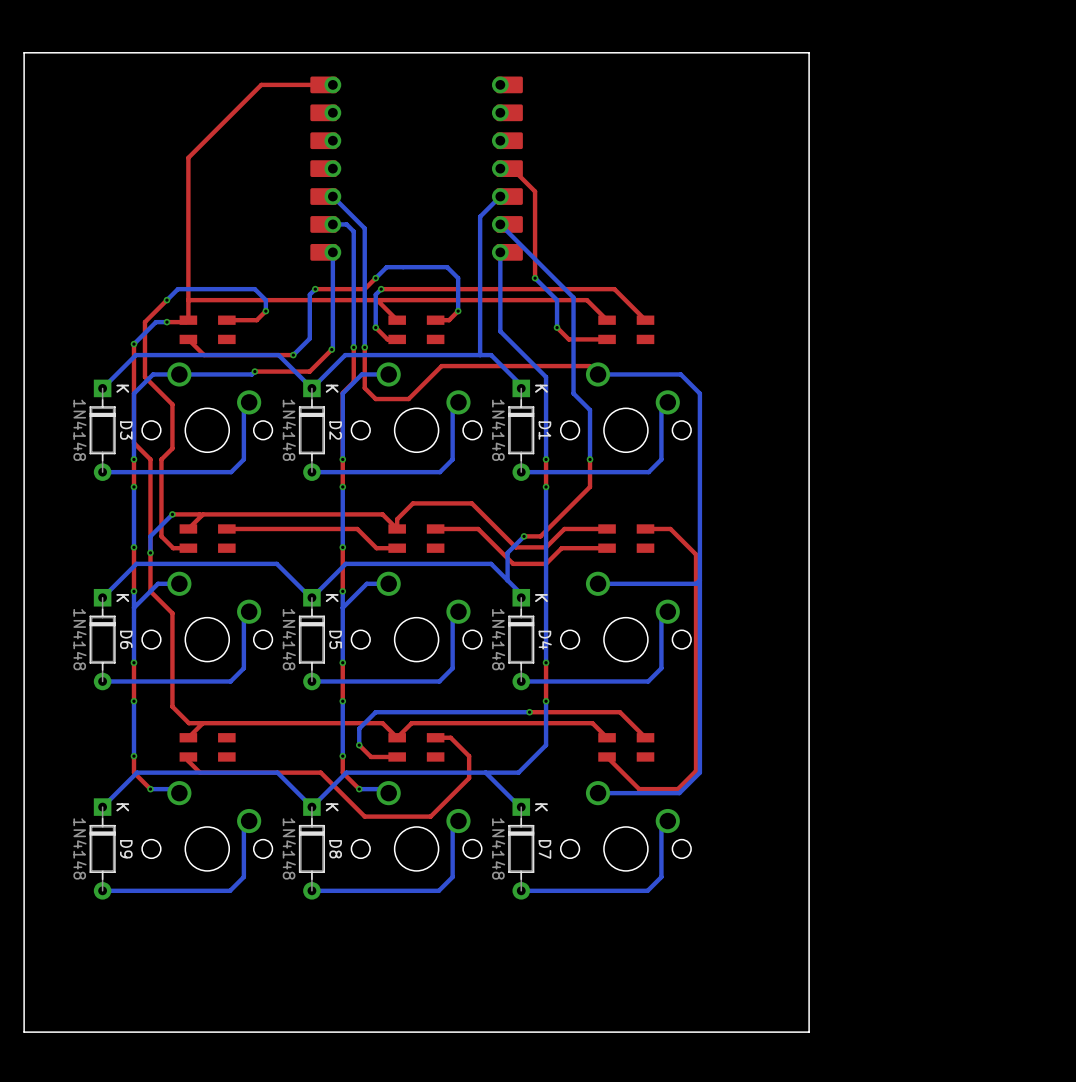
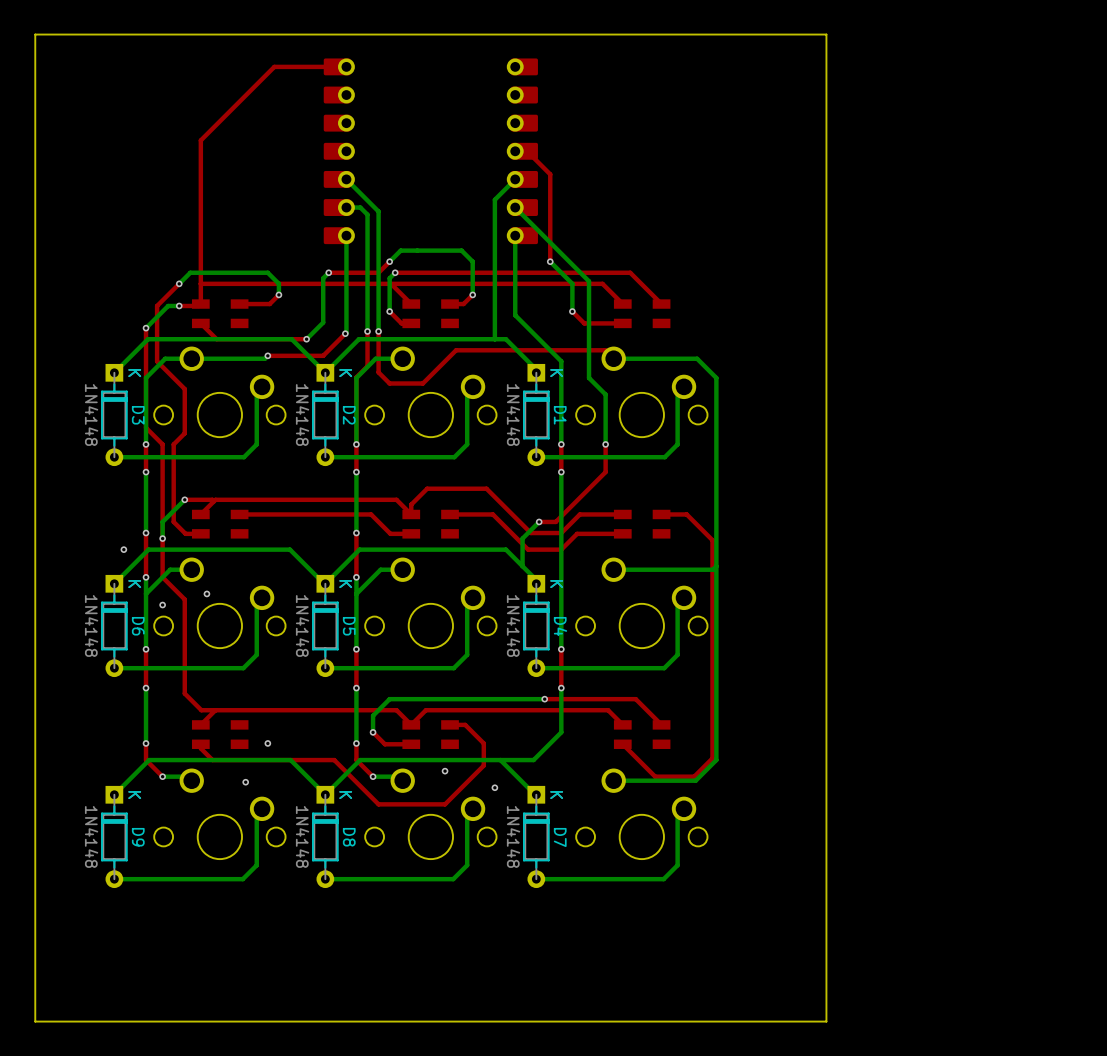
via: none -> (123, 549)
via: none -> (206, 593)
via: none -> (162, 605)
via: none -> (267, 743)
via: none -> (445, 771)
via: none -> (245, 782)
via: none -> (494, 787)

